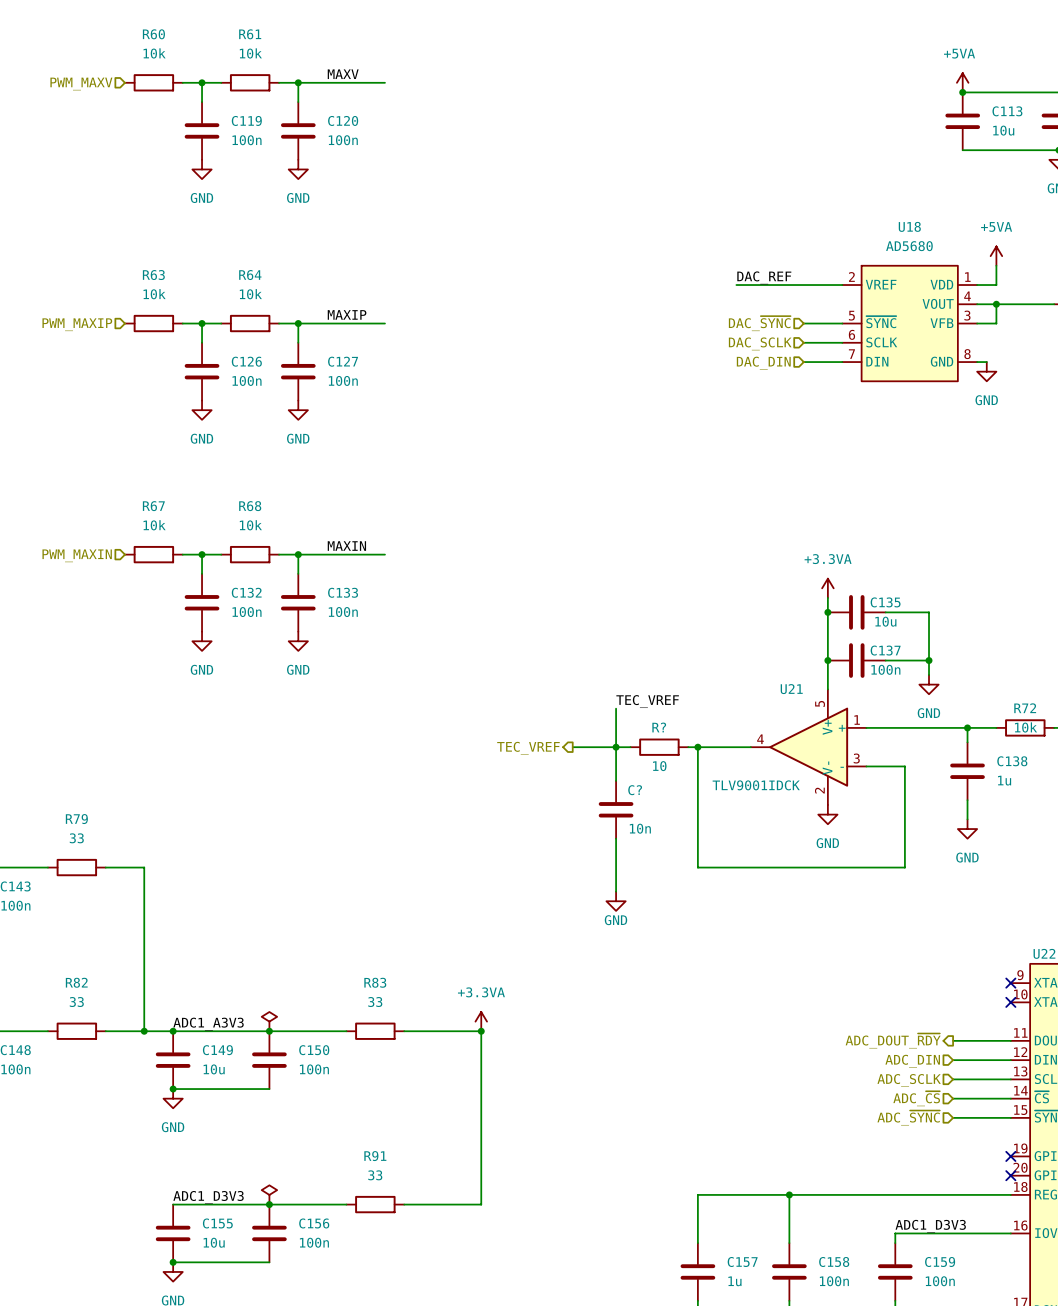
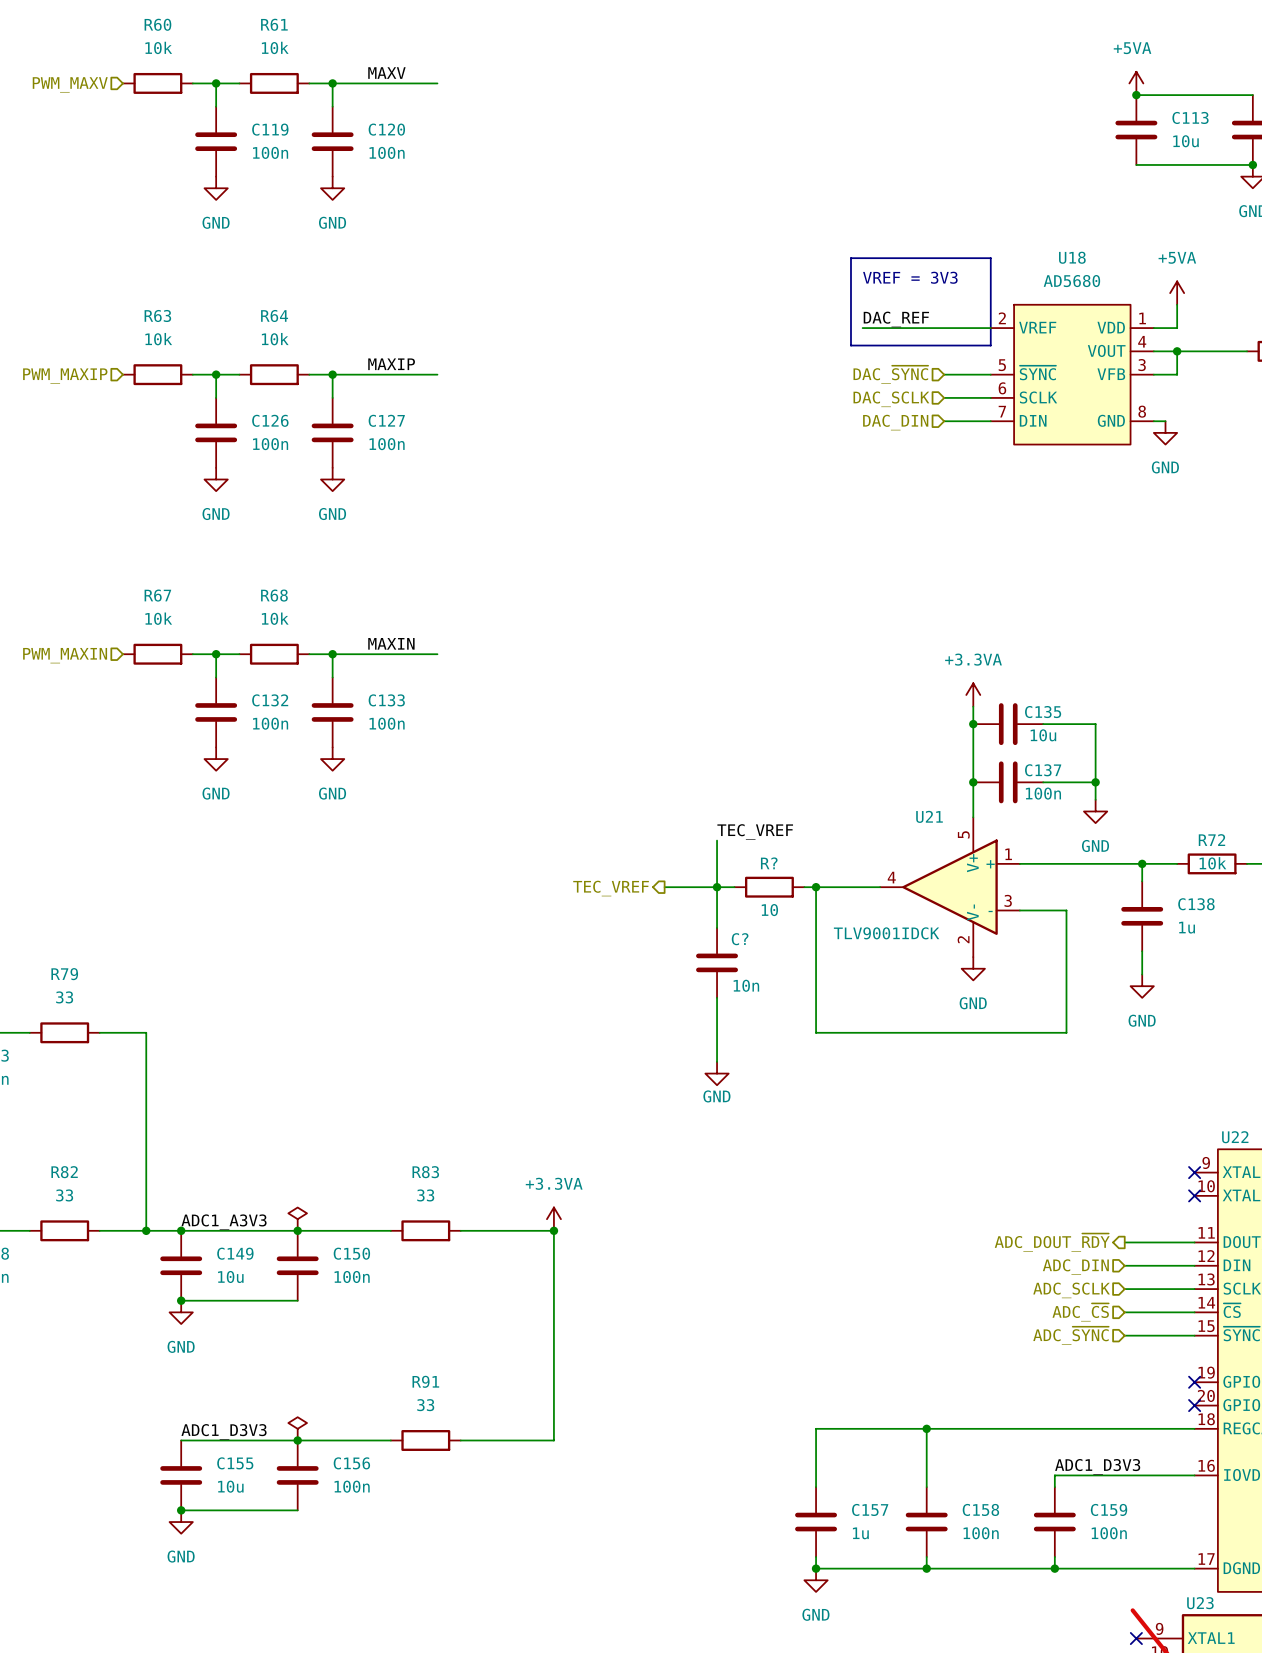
line: none -> (850, 258) (990, 258) (990, 345) (850, 345) (850, 258)
text: none -> VREF = 3V3 (910, 277)

